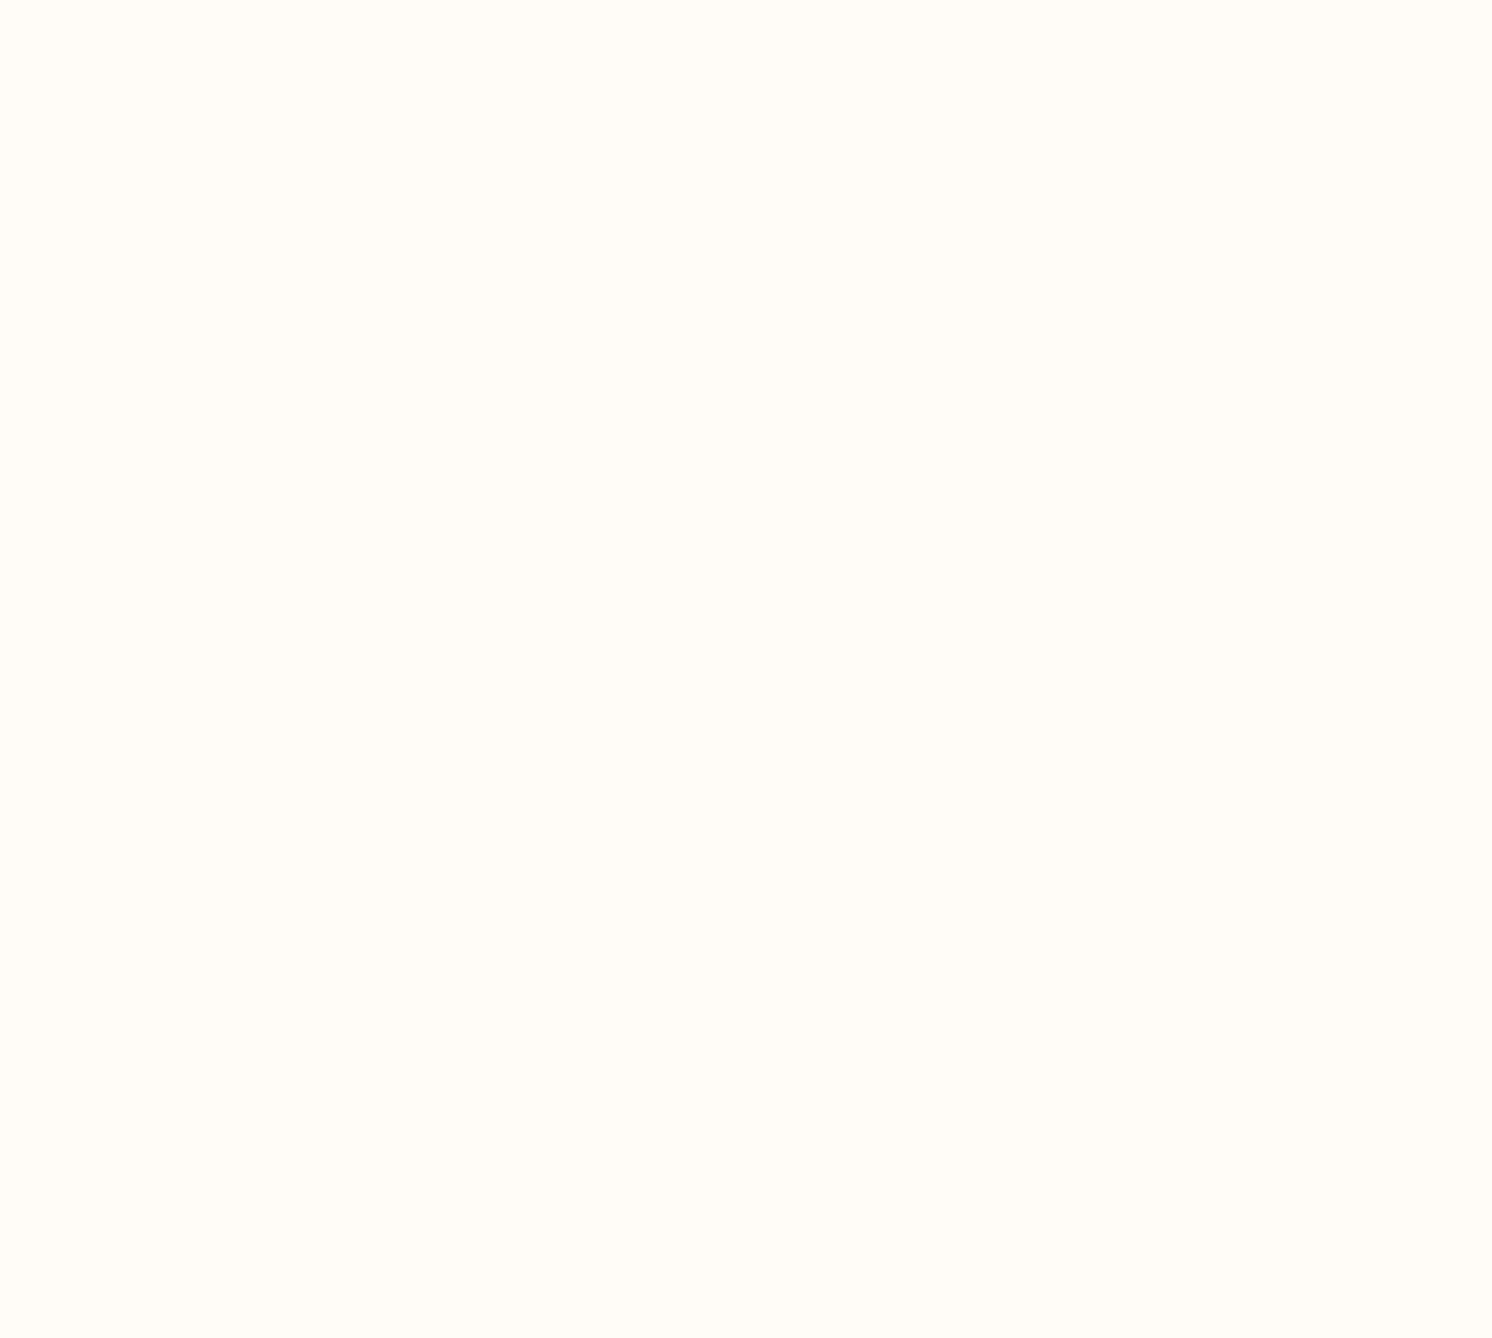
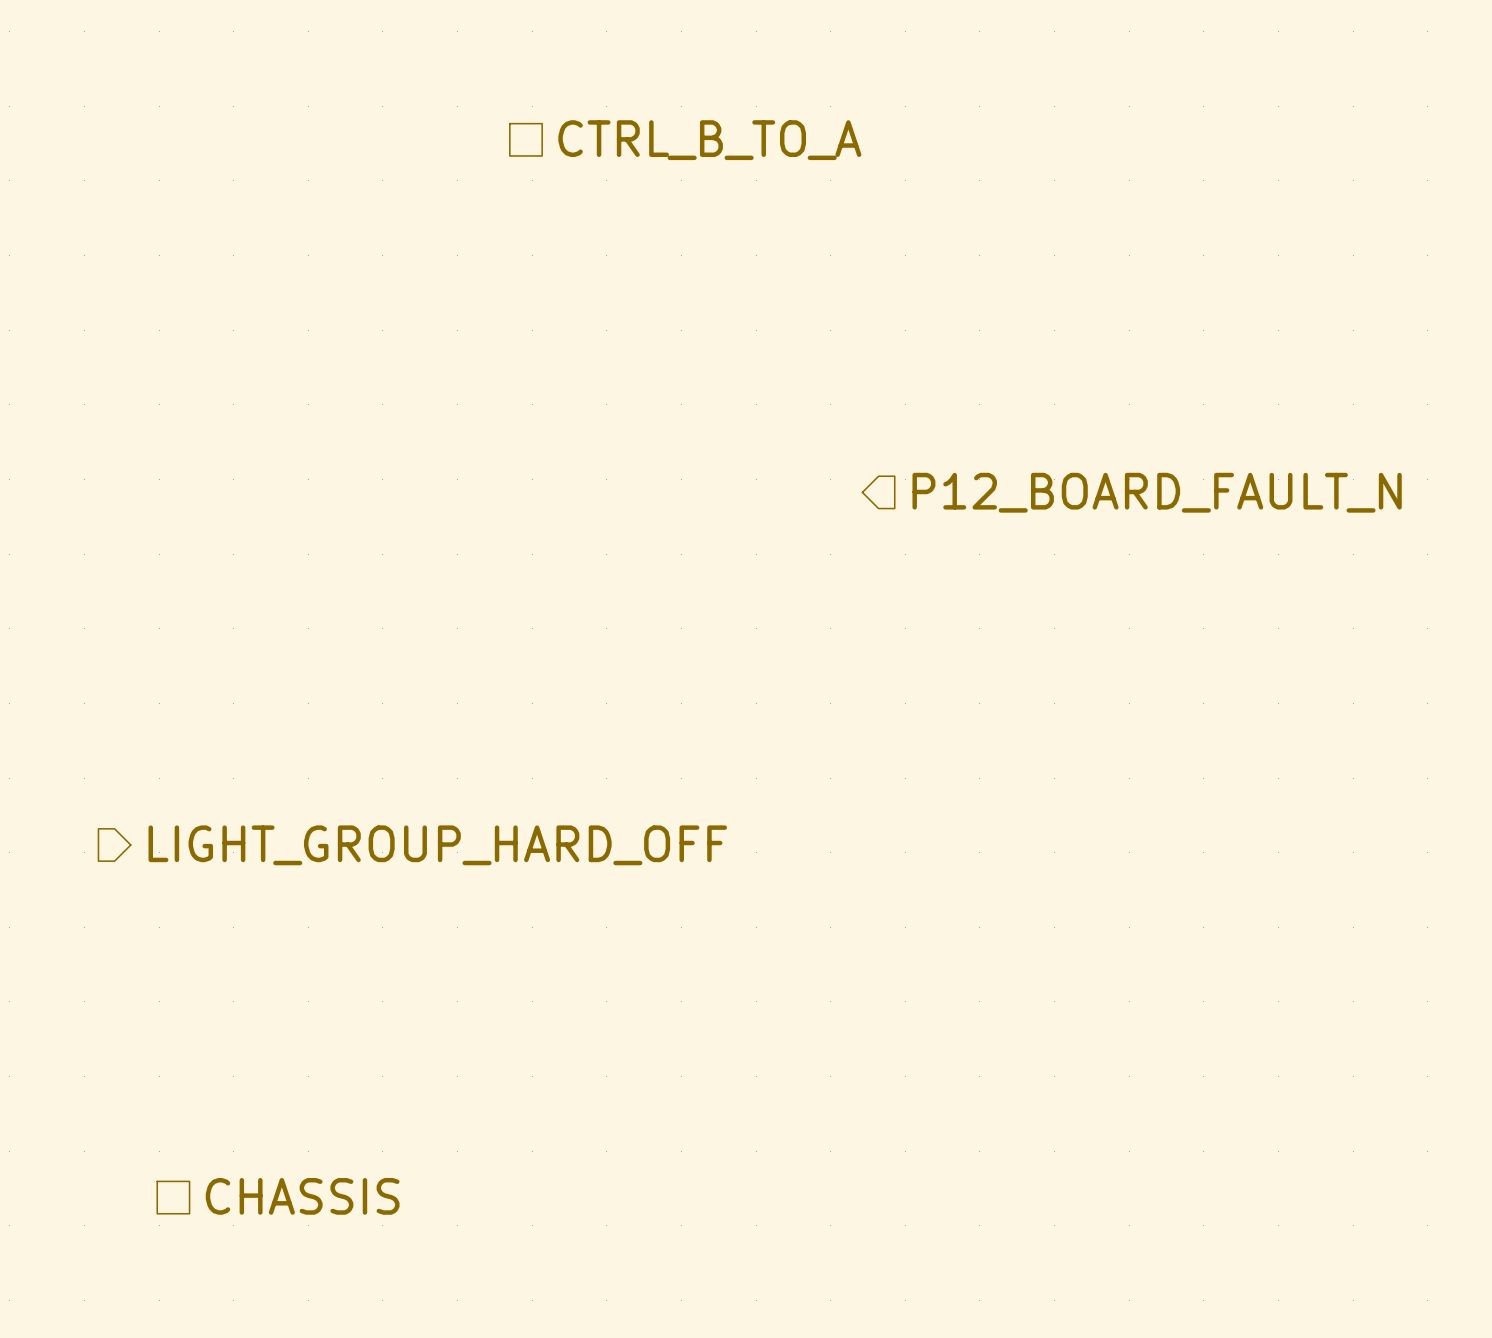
hierarchical label: none -> CTRL_B_TO_A (709, 140)
hierarchical label: none -> P12_BOARD_FAULT_N (1157, 492)
hierarchical label: none -> LIGHT_GROUP_HARD_OFF (437, 845)
hierarchical label: none -> CHASSIS (302, 1196)

